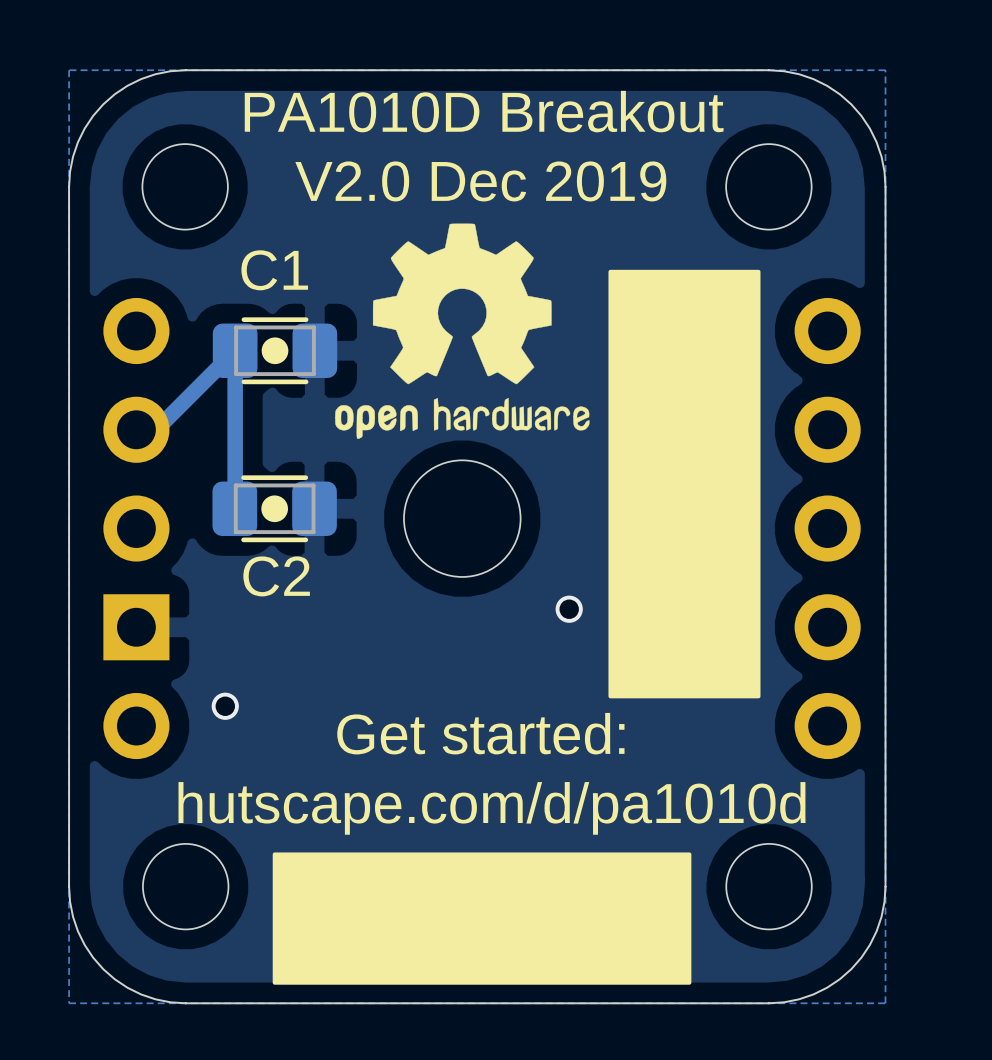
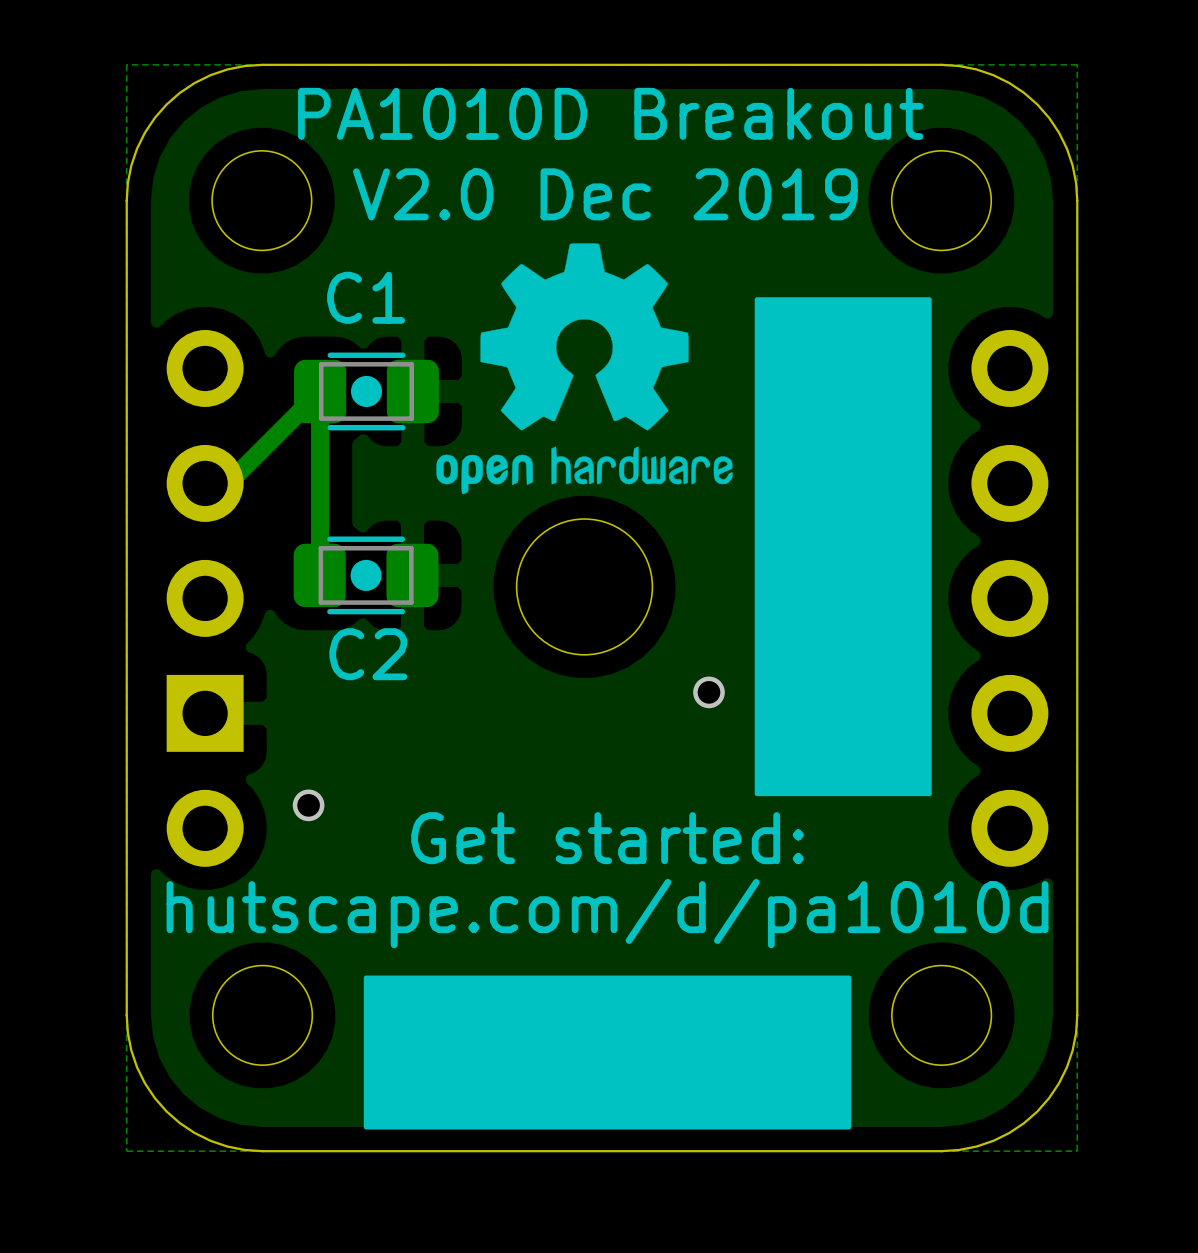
text position: hutscape.com/d/pa1010d (492, 808) -> hutscape.com/d/pa1010d (607, 913)

